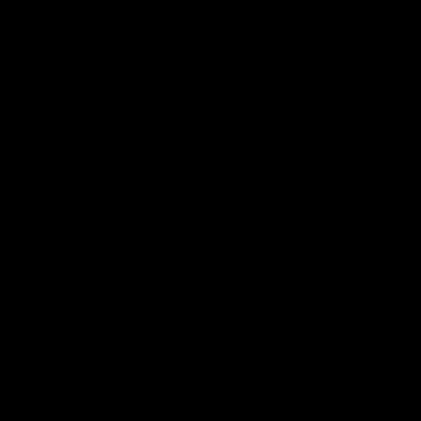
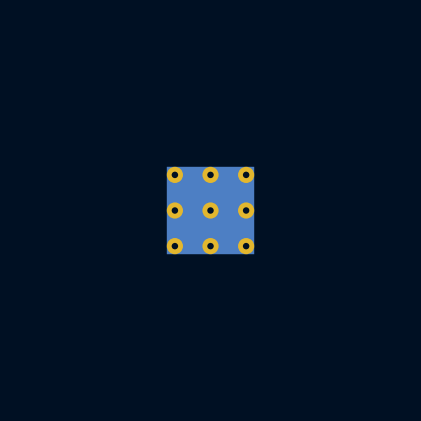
part: none -> (210, 210)

